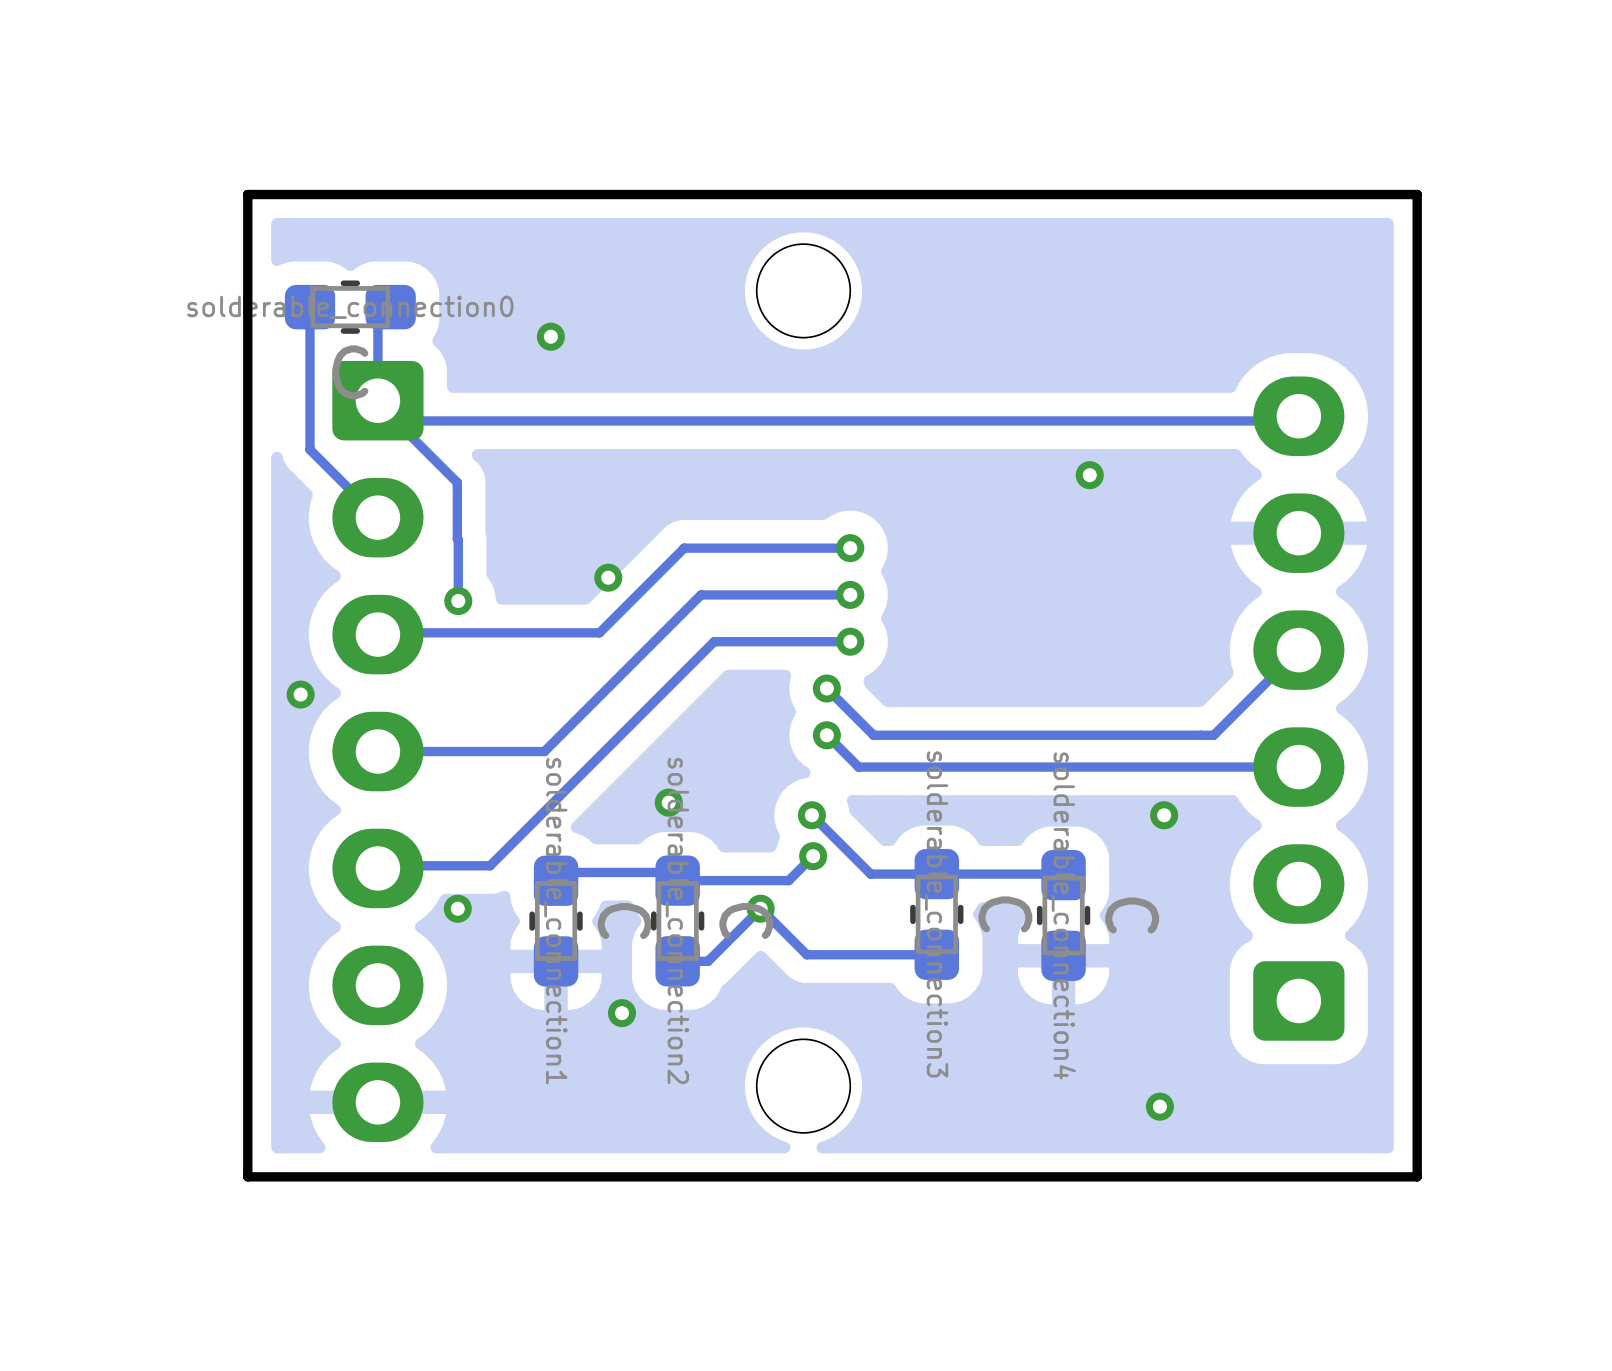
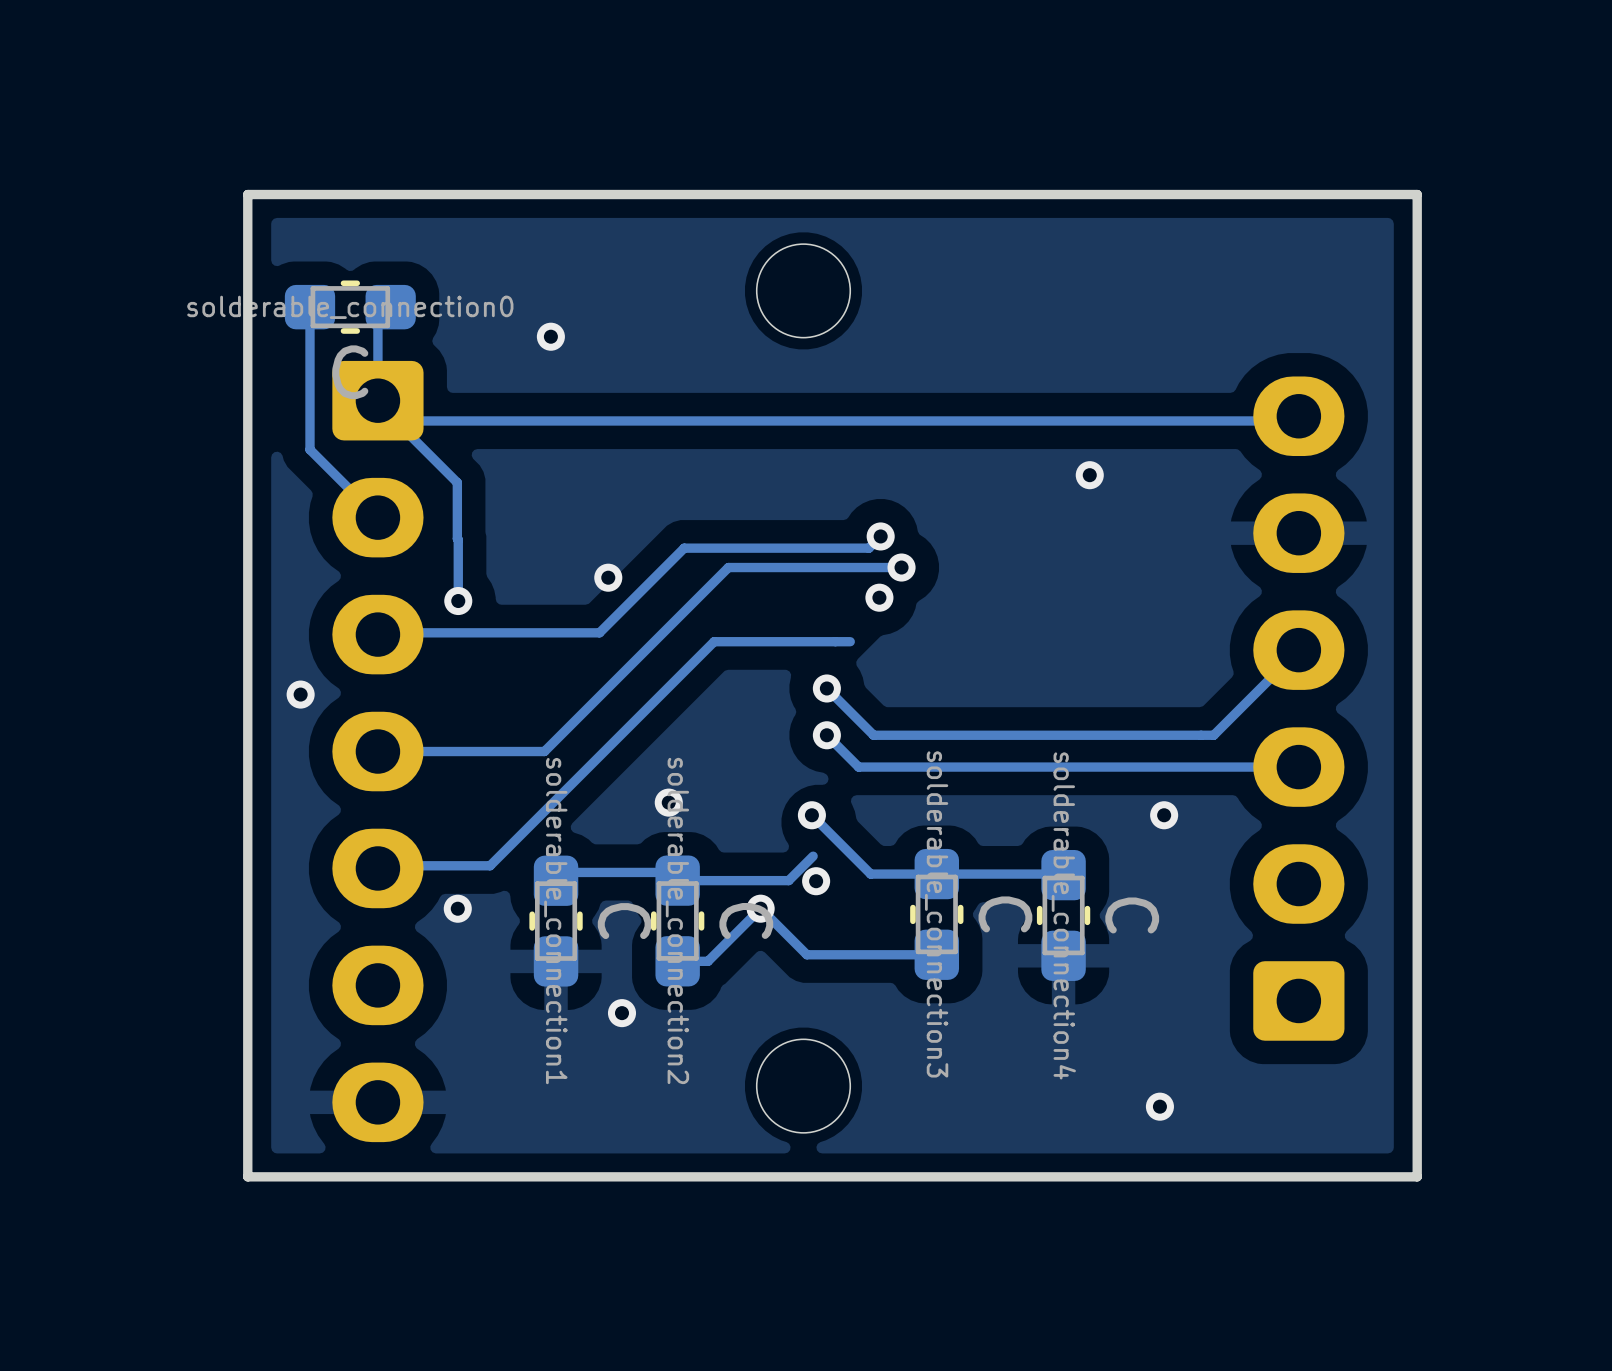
track: none -> (880, 536) (868, 548) (850, 548)
via: none -> (880, 536)
via: (850, 548) -> none
via: none -> (901, 567)
track: (850, 594) (701, 594) -> (901, 567) (728, 567) (701, 594)
via: (850, 594) -> none
via: none -> (879, 597)
via: (850, 641) -> none
via position: (813, 856) -> (816, 881)

